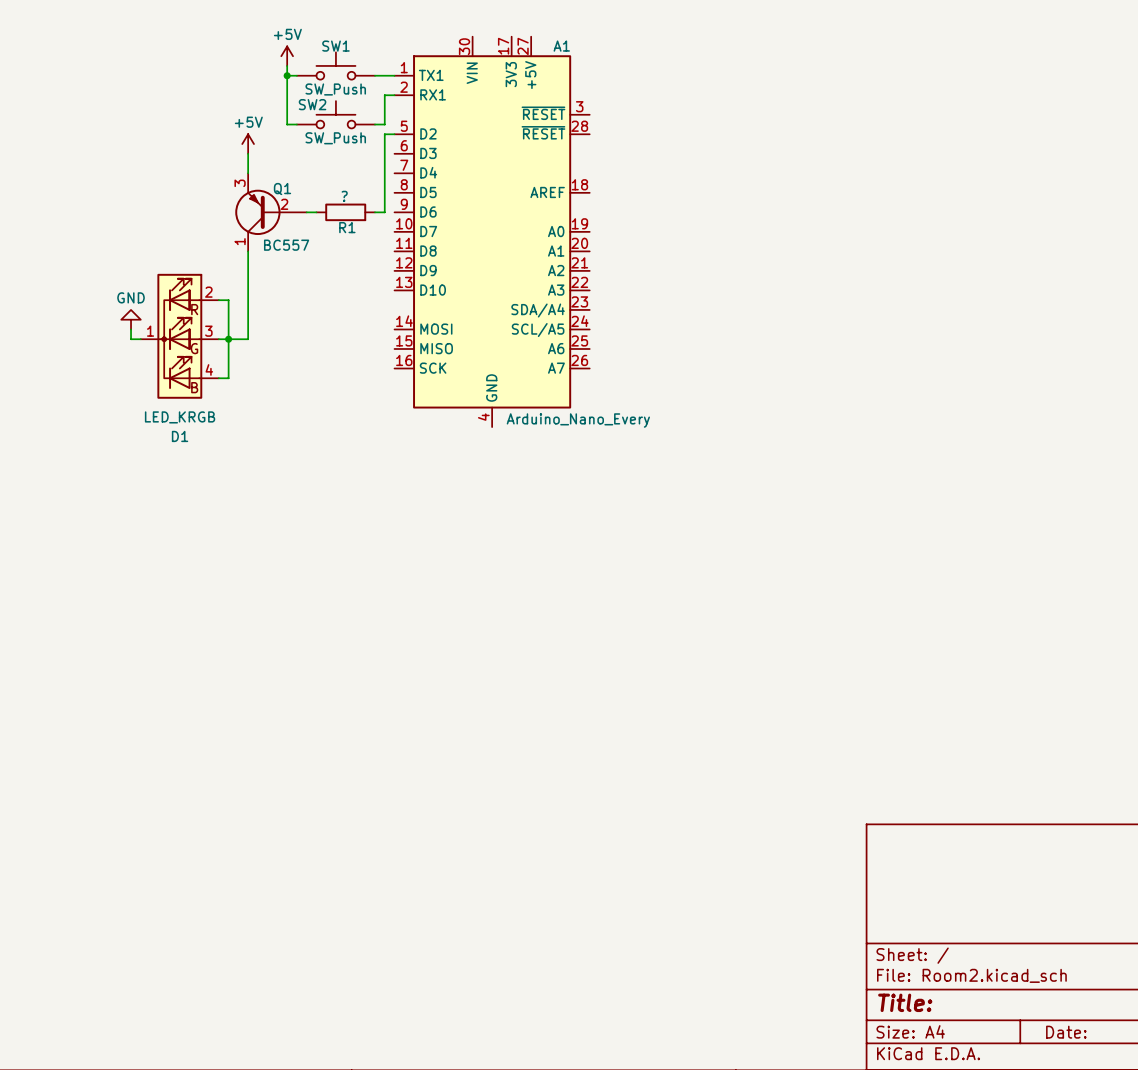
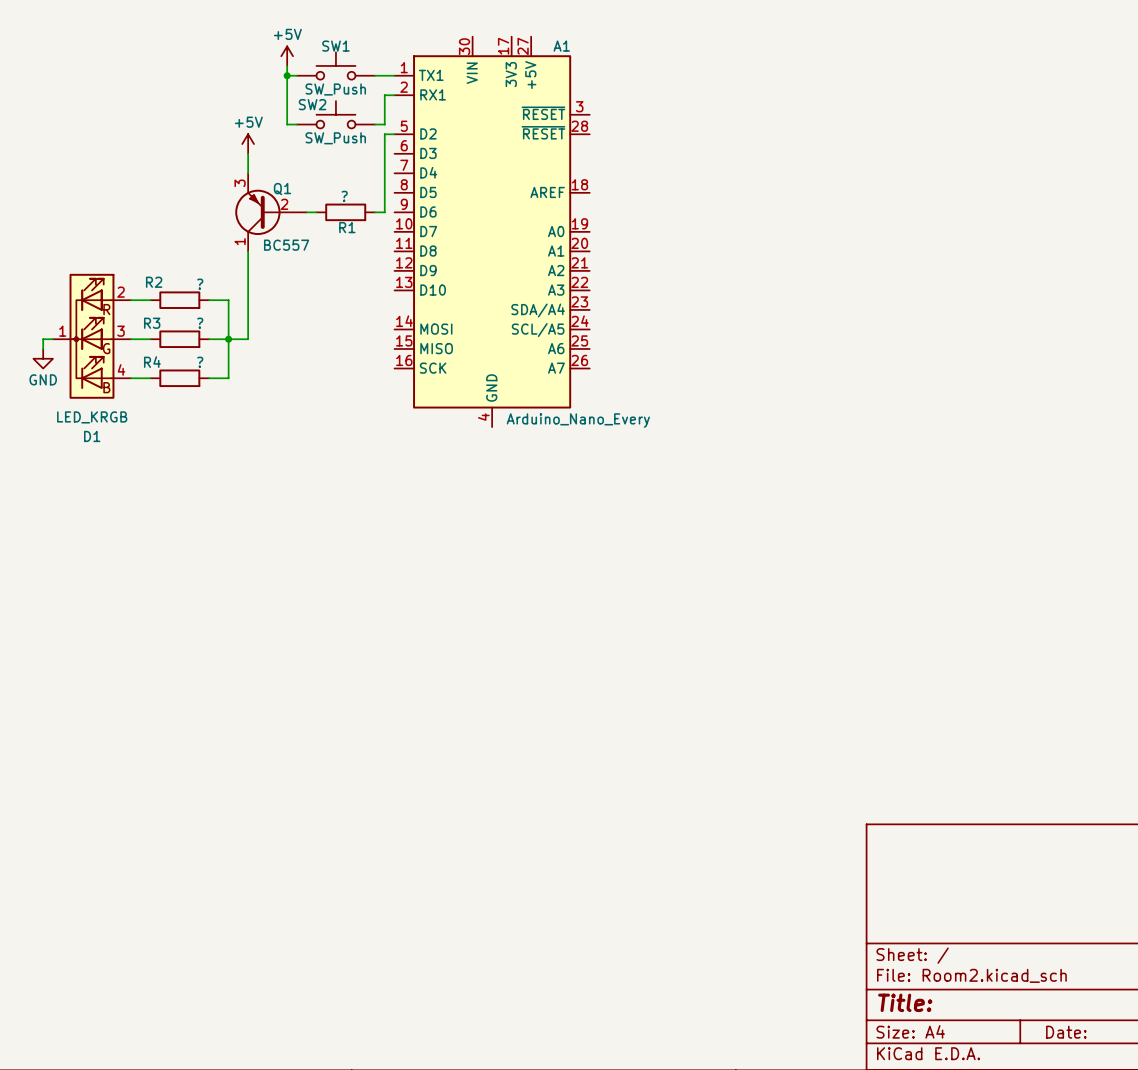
wire: none -> (131, 300) (150, 300)
R2: none -> ? (179, 300)
power symbol rotation: 0° (131, 319) -> 180° (43, 358)
power symbol position: GND (131, 319) -> GND (43, 358)
wire: (131, 329) (131, 339) -> none
D1 position: (179, 336) -> (91, 336)
wire: none -> (52, 339) (43, 339) (43, 348)
R3: none -> ? (179, 339)
wire: none -> (131, 378) (150, 378)
R4: none -> ? (179, 378)

